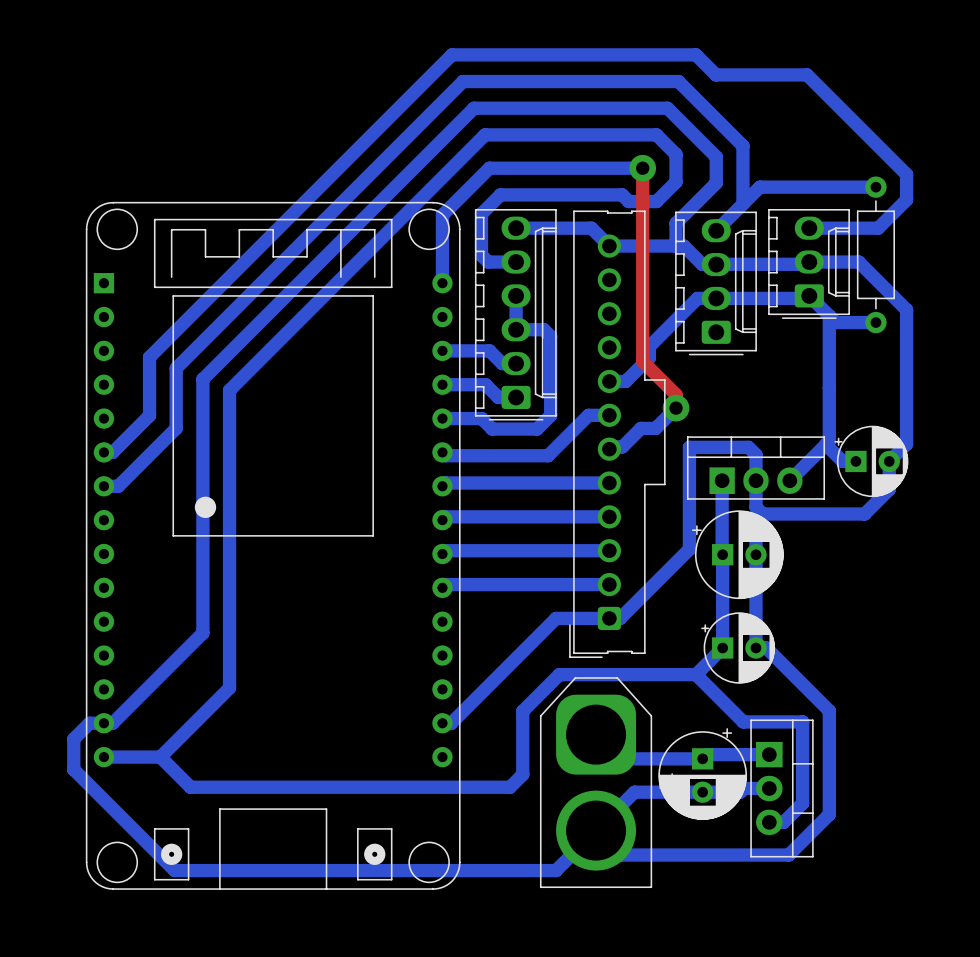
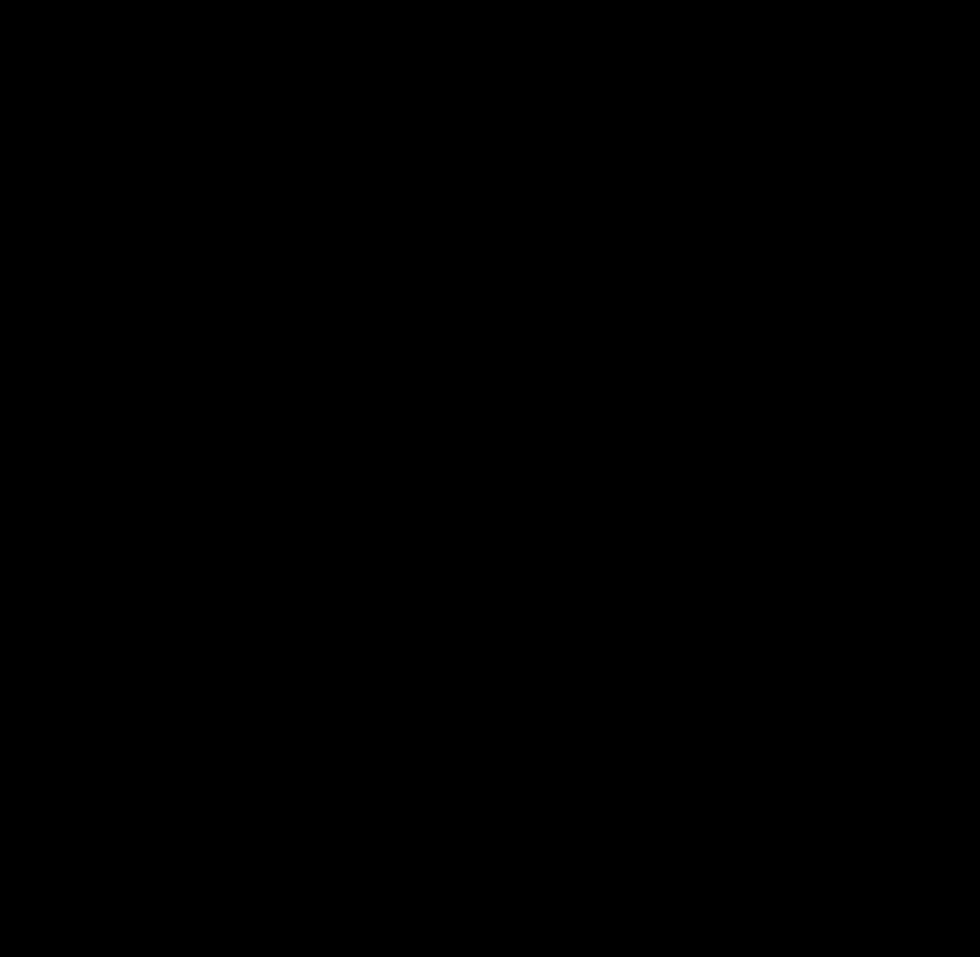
bottom track: (642, 168) (489, 168) (442, 215) (442, 283) -> none
top track: (642, 168) (642, 361) (676, 394) (676, 408) -> none
via: (642, 168) -> none
bottom track: (875, 187) (759, 187) (716, 230) -> none
bottom track: (742, 204) (742, 145) (678, 81) (462, 81) (176, 368) (176, 428) (118, 486) (103, 486) -> none
bottom track: (516, 228) (591, 228) (609, 246) (683, 246) (702, 264) (807, 264) (809, 262) (858, 262) (906, 309) (906, 444) (889, 461) (889, 489) (864, 514) (762, 514) -> none
bottom track: (809, 228) (878, 228) (906, 199) (906, 174) (807, 74) (716, 74) (695, 54) (451, 54) (149, 357) (149, 415) (112, 452) (103, 452) -> none
bottom track: (676, 246) (676, 223) (716, 183) (716, 156) (667, 108) (474, 108) (202, 379) (202, 633) (112, 723) (89, 723) (73, 739) (73, 769) (174, 870) (556, 870) (634, 792) (740, 792) (743, 788) (769, 788) -> none
part: (875, 254) -> none
bottom track: (516, 262) (488, 262) (481, 255) (481, 213) (500, 194) (622, 194) (628, 201) (656, 201) (676, 182) (676, 154) (656, 134) (485, 134) (229, 390) (229, 687) (160, 757) -> none
part: (809, 263) -> none
part: (716, 283) -> none
bottom track: (516, 295) (516, 329) (544, 329) (550, 336) (550, 415) (537, 429) (492, 429) (481, 418) (442, 418) -> none
part: (515, 314) -> none
bottom track: (829, 315) (829, 441) (789, 480) -> none
bottom track: (875, 322) (835, 322) (809, 295) (806, 298) (697, 298) (649, 346) (649, 357) (625, 381) (609, 381) -> none
bottom track: (442, 350) (489, 350) (502, 363) (516, 363) -> none
bottom track: (442, 384) (485, 384) (498, 397) (516, 397) -> none
bottom track: (676, 408) (655, 428) (640, 428) (622, 446) (609, 446) (609, 449) -> none
via: (676, 408) -> none
bottom track: (609, 415) (588, 415) (548, 455) (445, 455) (442, 452) -> none
part: (617, 434) -> none
bottom track: (825, 444) (842, 461) (855, 461) -> none
part: (871, 461) -> none
part: (755, 468) -> none
bottom track: (722, 480) (722, 648) (696, 674) -> none
bottom track: (609, 483) (445, 483) (442, 486) -> none
bottom track: (762, 514) (755, 507) (755, 454) (748, 447) (689, 447) (689, 549) (620, 618) (556, 618) (451, 723) (442, 723) -> none
bottom track: (762, 514) (755, 520) (755, 648) (766, 648) (829, 710) (829, 814) (788, 855) (620, 855) (596, 830) -> none
bottom track: (609, 516) (445, 516) (442, 520) -> none
part: (273, 545) -> none
bottom track: (609, 550) (445, 550) (442, 553) -> none
part: (737, 554) -> none
bottom track: (609, 584) (445, 584) (442, 587) -> none
part: (738, 648) -> none
bottom track: (696, 674) (743, 721) (802, 721) (802, 803) (783, 822) (769, 822) -> none
bottom track: (696, 674) (559, 674) (522, 711) (522, 774) (510, 787) (190, 787) (160, 757) -> none
bottom track: (769, 754) (706, 754) (702, 758) (568, 758) -> none
bottom track: (103, 757) (160, 757) -> none
part: (702, 773) -> none
part: (596, 782) -> none
part: (781, 788) -> none

